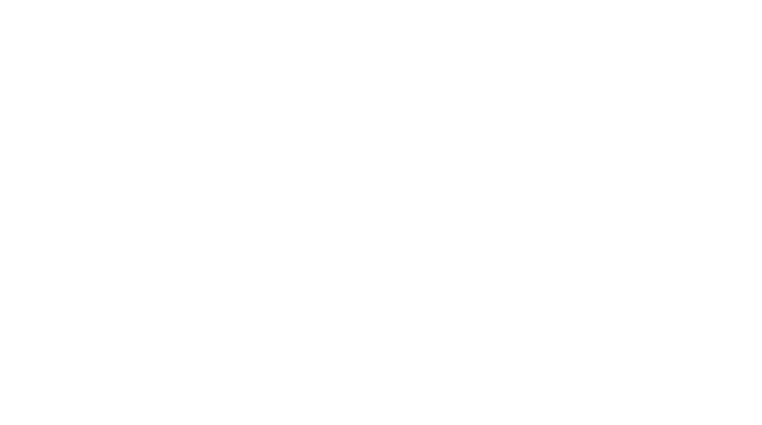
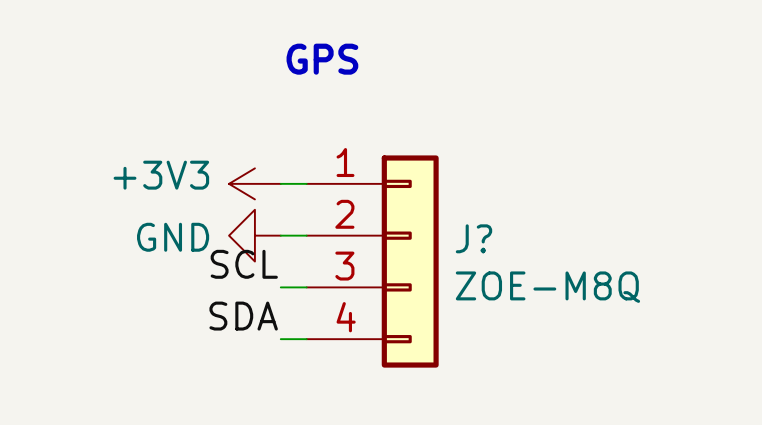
text: none -> GPS (322, 59)
power symbol: none -> +3V3 (254, 183)
wire: none -> (280, 183) (306, 183)
power symbol: none -> GND (254, 235)
wire: none -> (280, 235) (306, 235)
J?: none -> ZOE-M8Q (372, 261)
label: none -> SCL (244, 264)
wire: none -> (280, 287) (306, 287)
label: none -> SDA (243, 316)
wire: none -> (280, 339) (306, 339)

